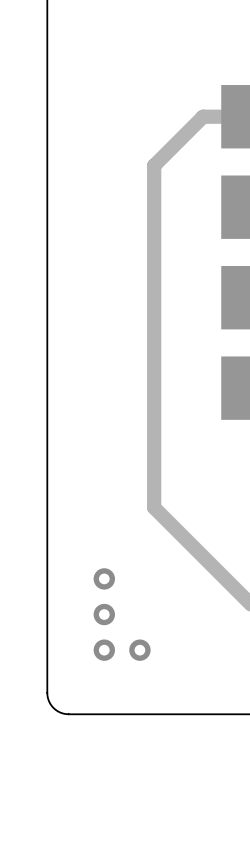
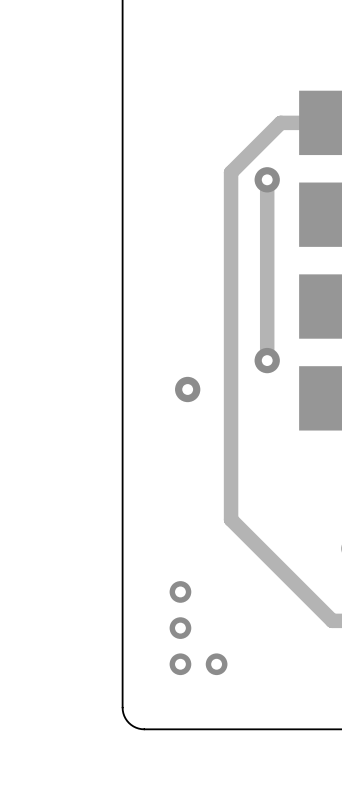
track: none -> (267, 179) (267, 360)
via: none -> (267, 179)
via: none -> (267, 360)
via: none -> (187, 389)

